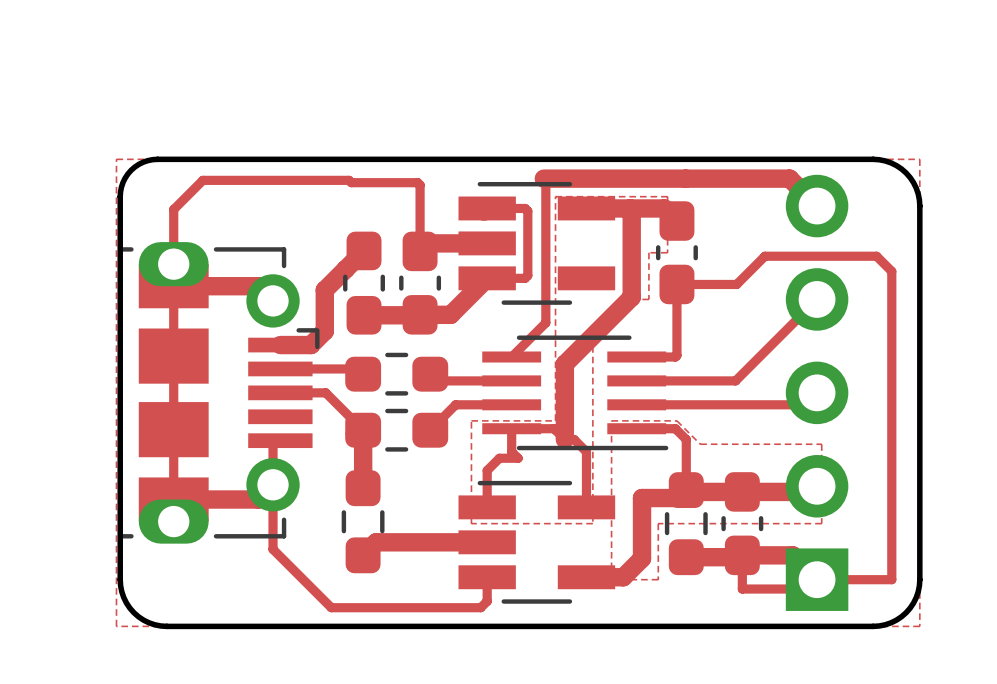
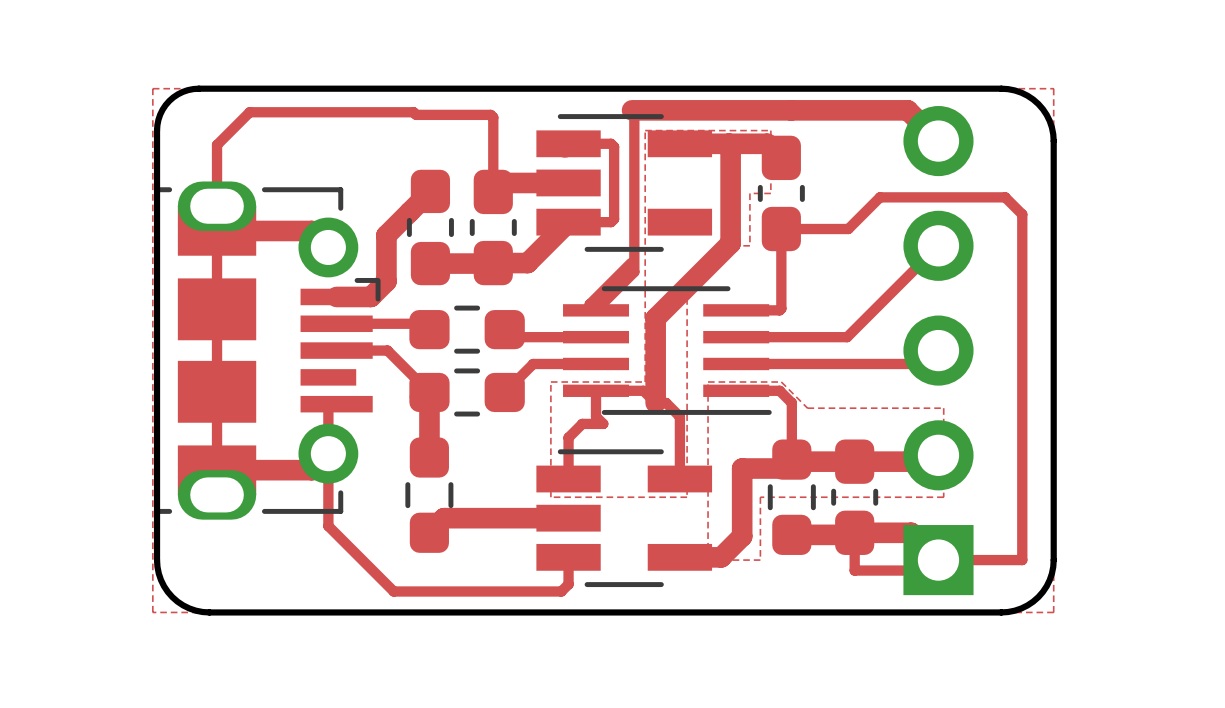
part footprint: [120, 242, 320, 544] -> [156, 181, 381, 520]
track: none -> (630, 263) (589, 304) (595, 310)

